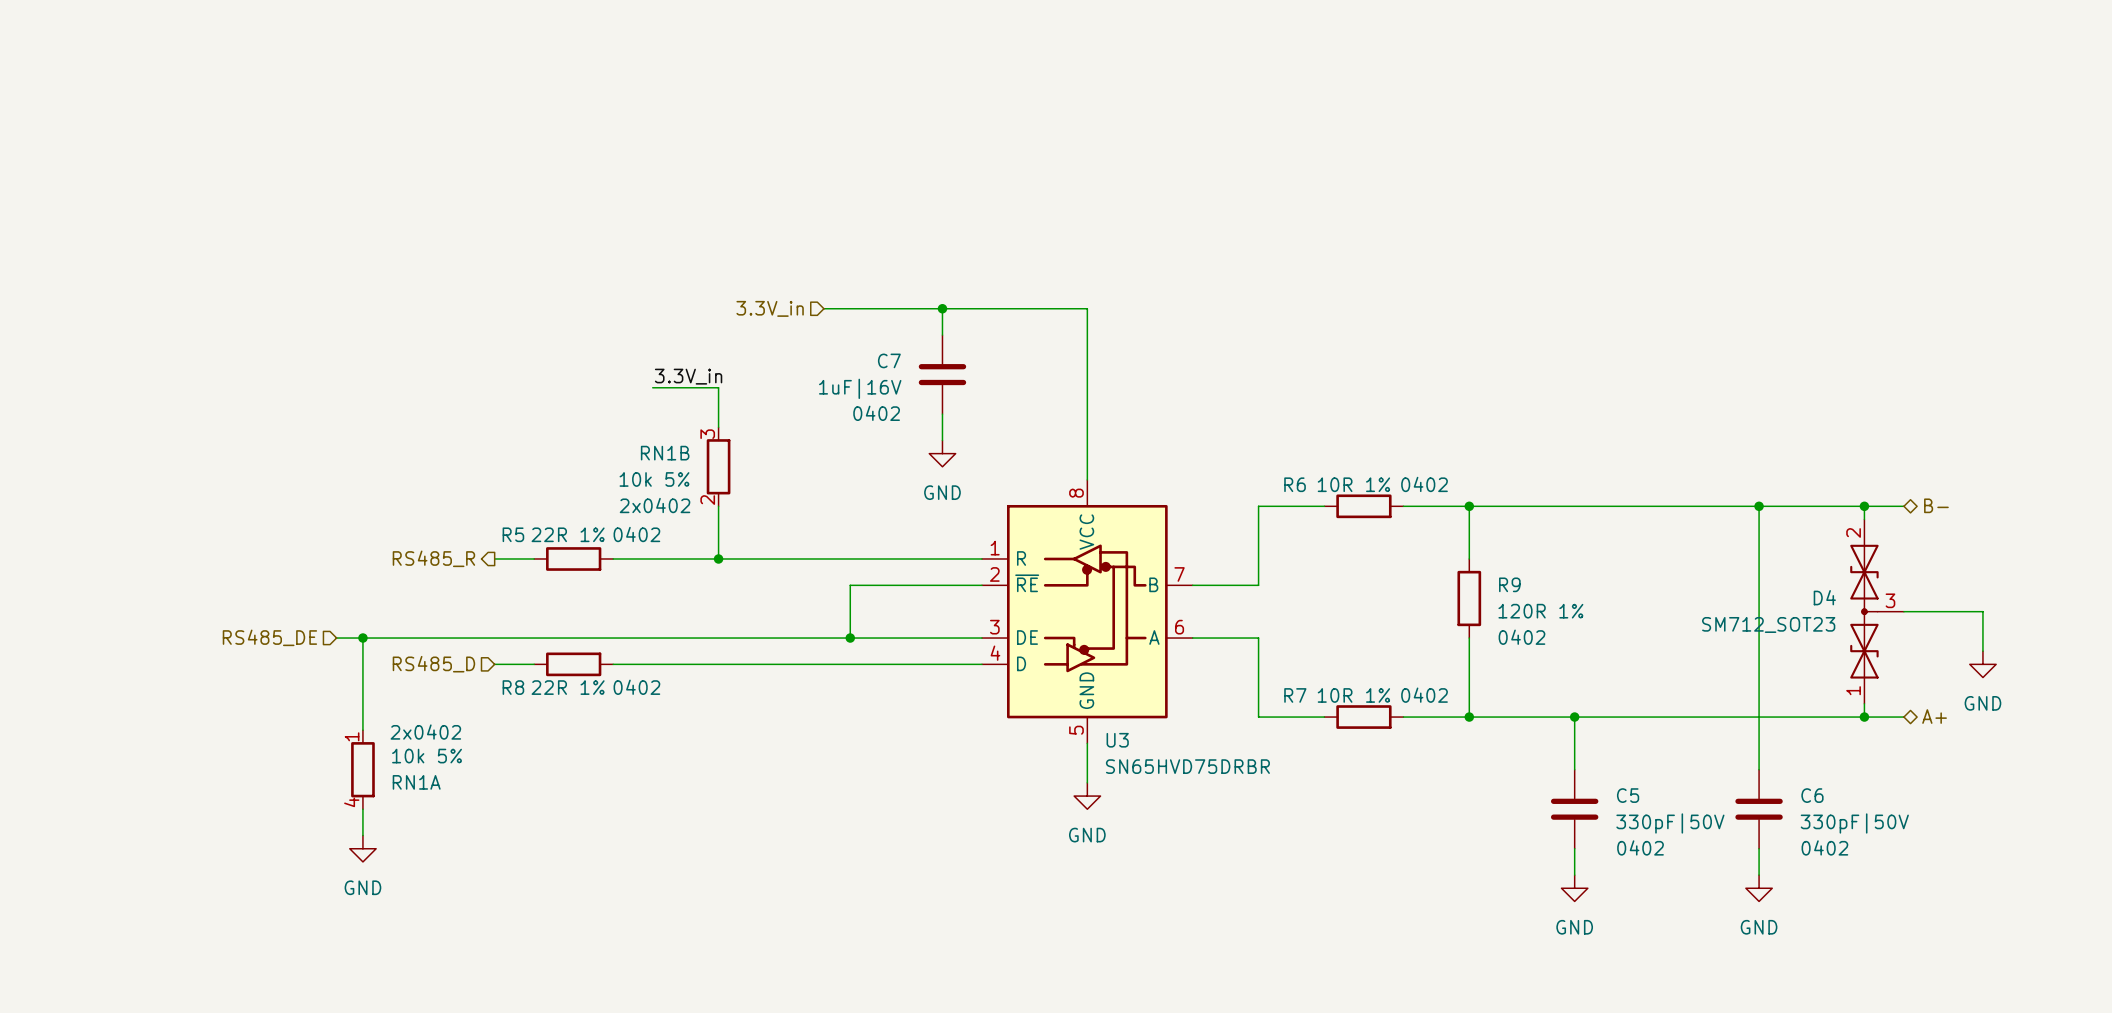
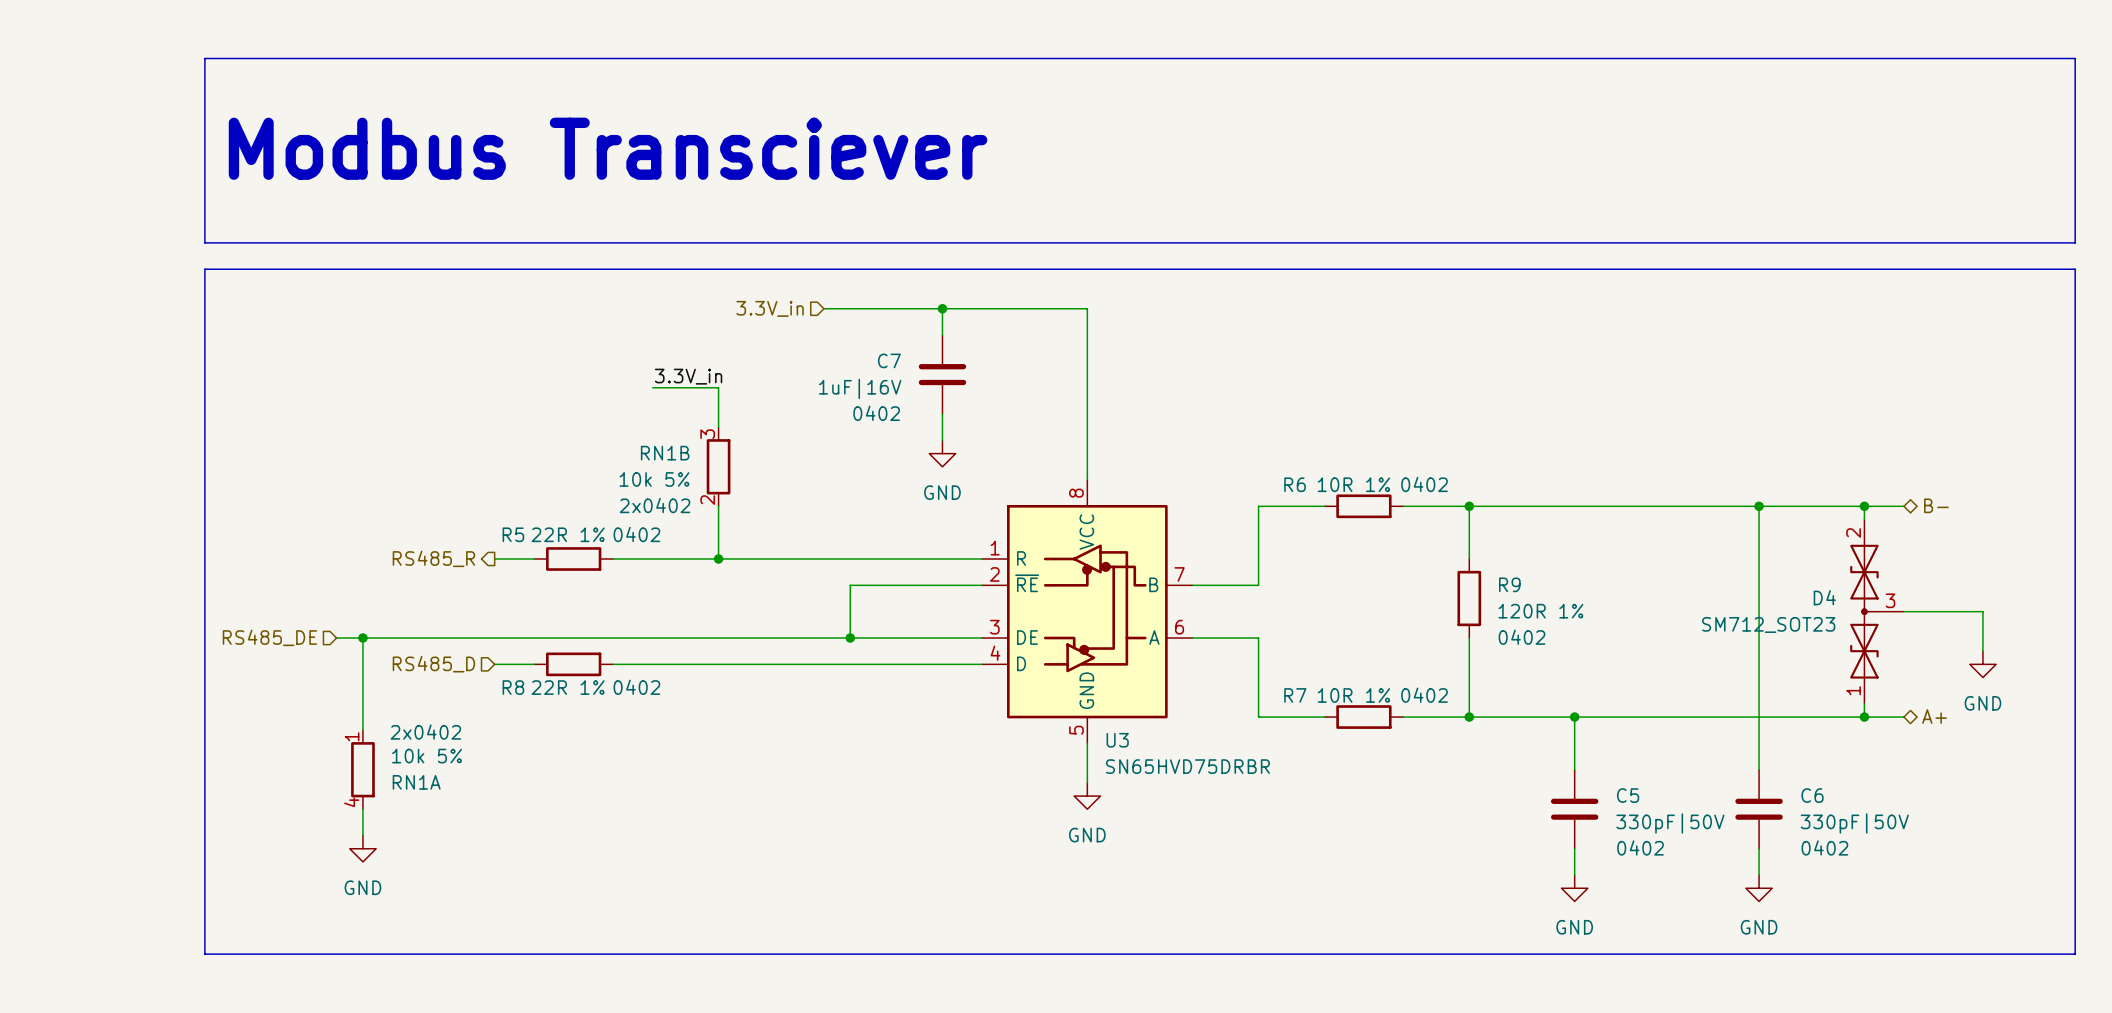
line: none -> (204, 58) (204, 242) (2075, 242) (2075, 58) (204, 58)
text: none -> Modbus Transciever (608, 148)
line: none -> (204, 269) (2075, 269) (2075, 954) (204, 954) (204, 269)

